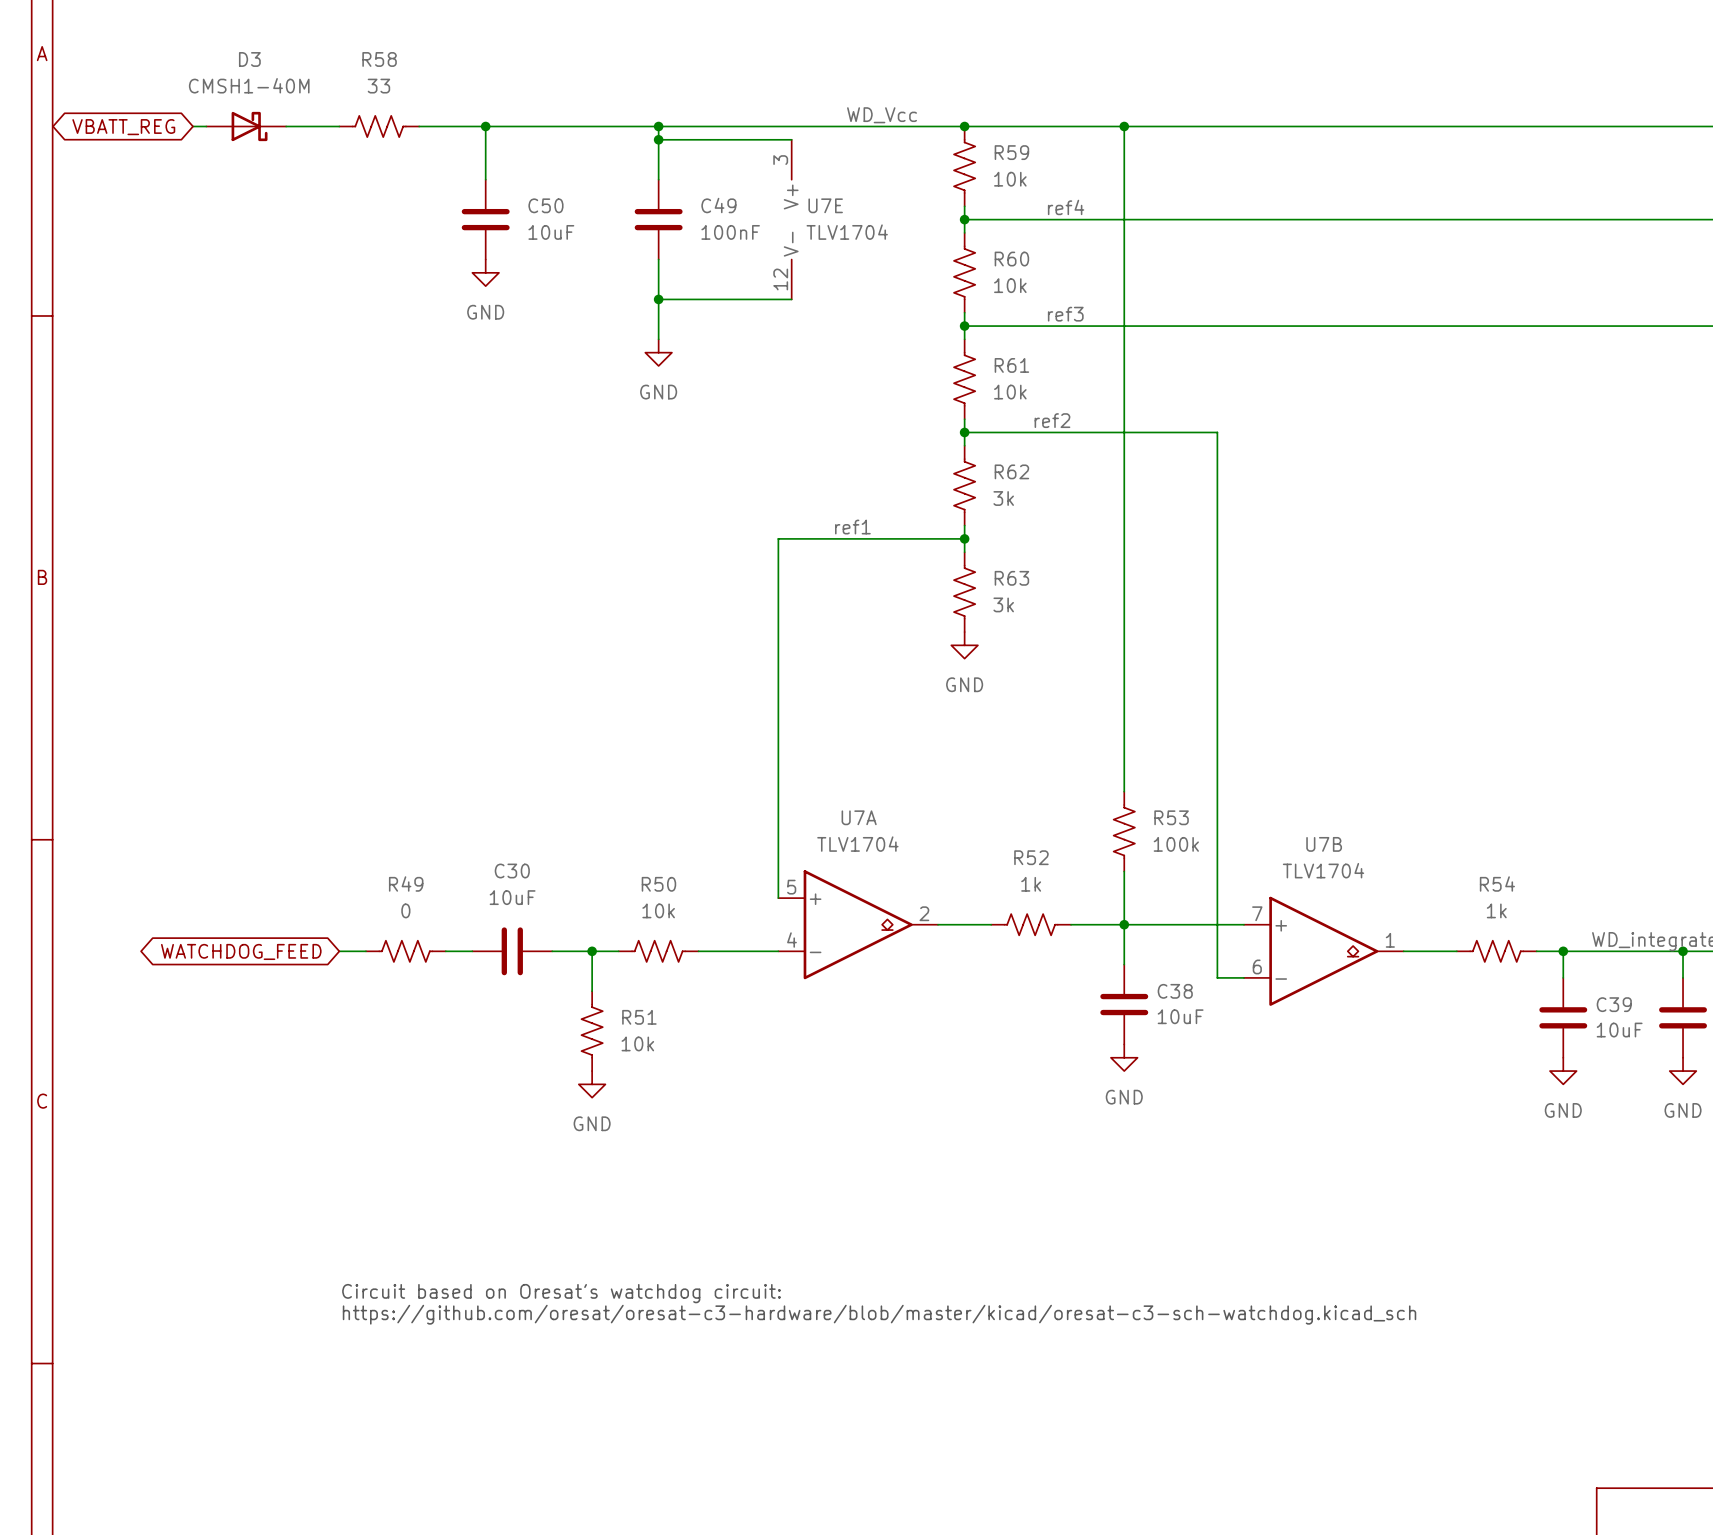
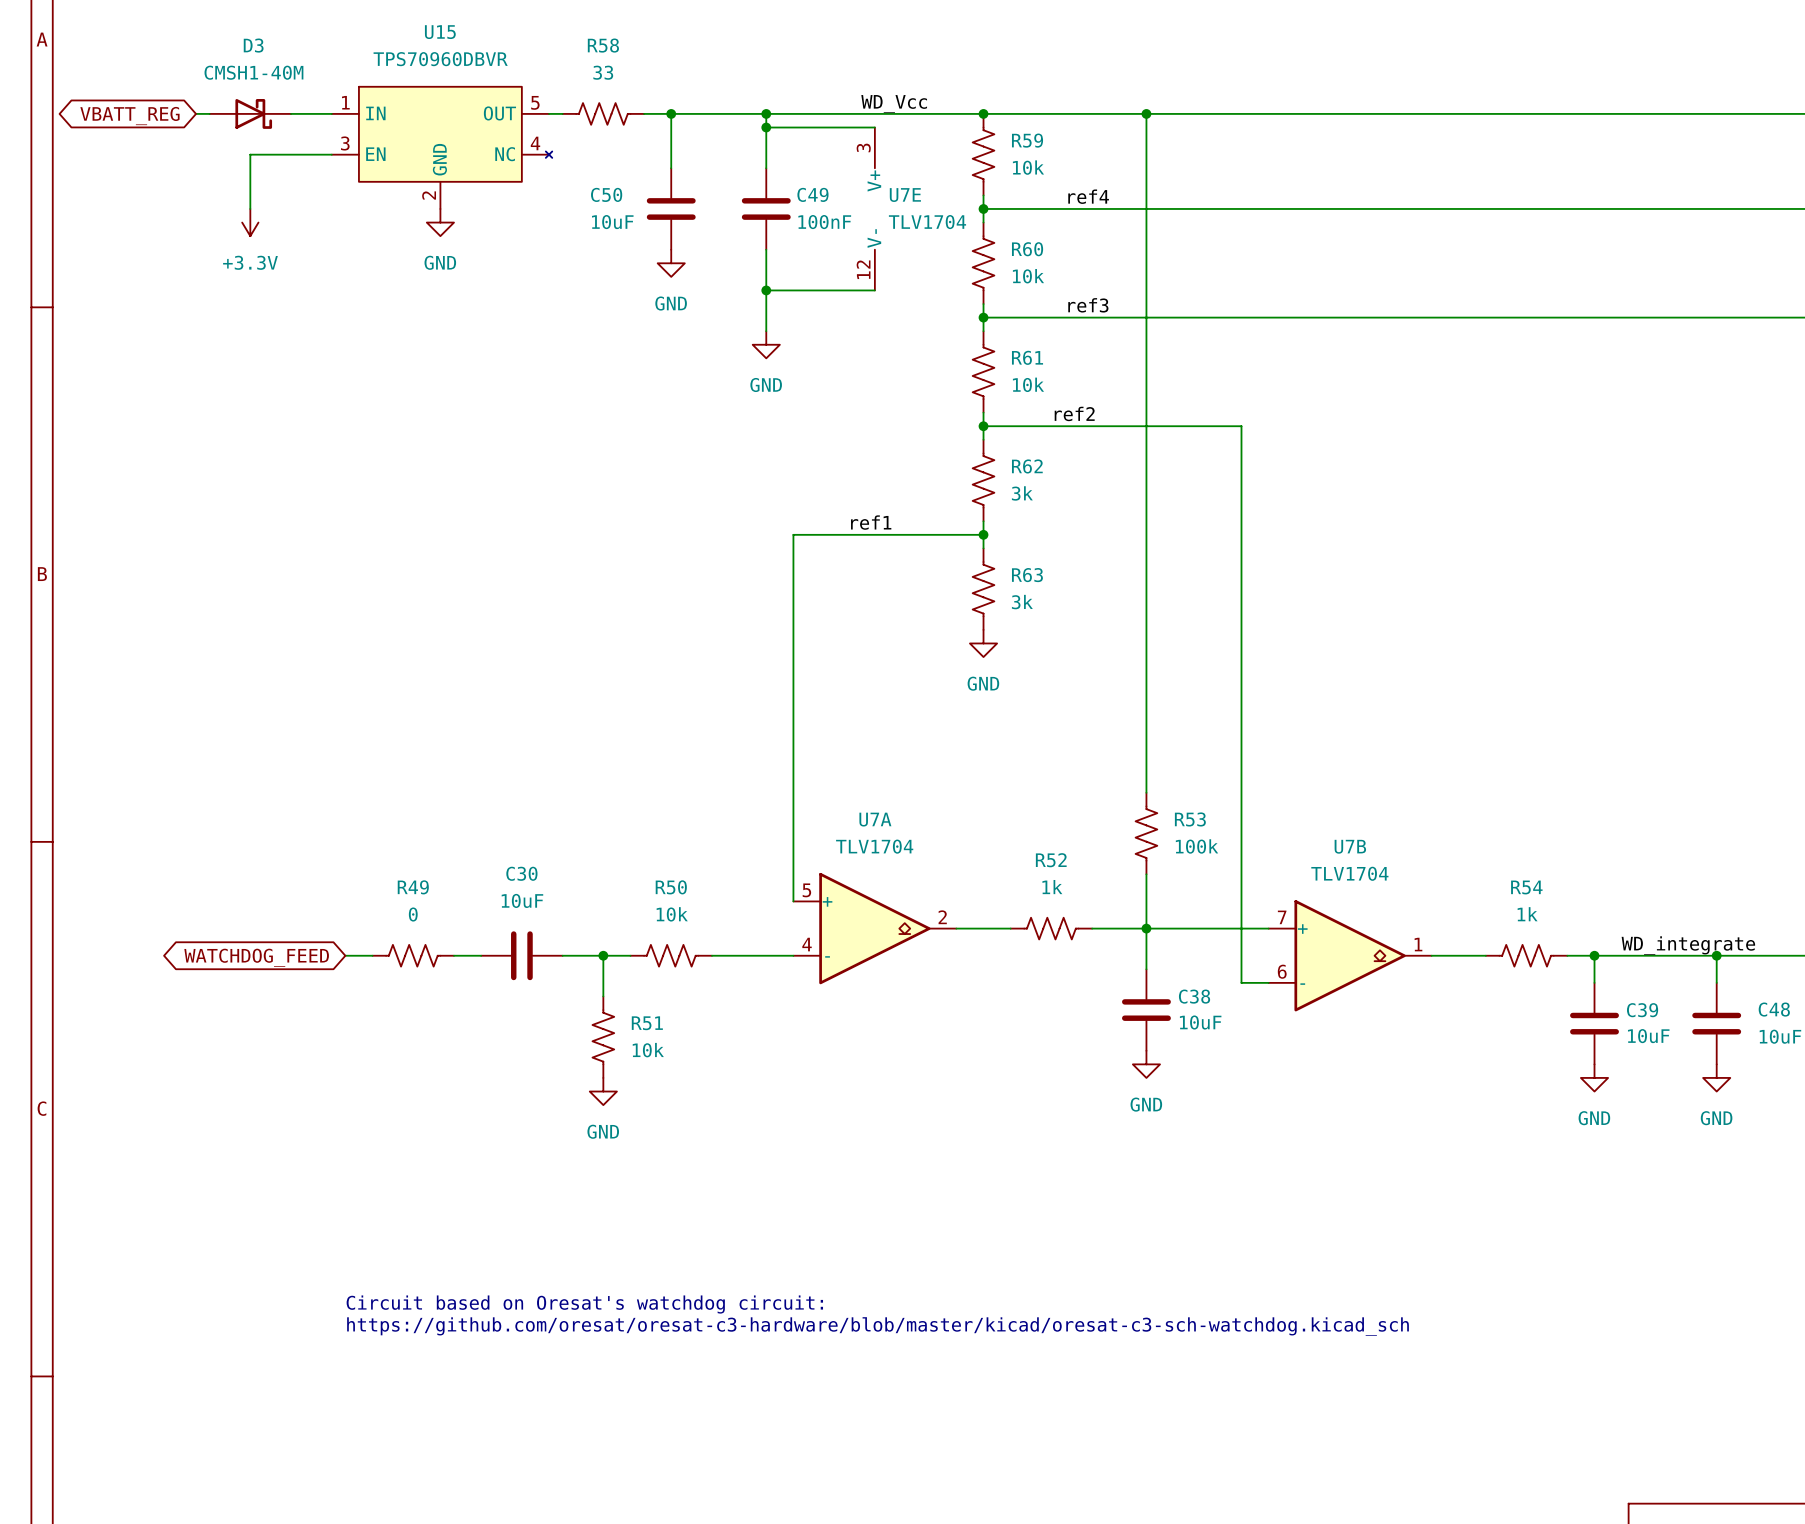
R58 position: (379, 126) -> (603, 113)
junction: (485, 126) -> none
wire: none -> (766, 113) (766, 168)
junction: none -> (766, 113)
wire: (658, 139) (751, 139) -> none
junction: (658, 139) -> none
junction: none -> (766, 127)
wire: none -> (807, 127) (874, 127)
U15: none -> TPS70960DBVR (442, 147)
wire: none -> (331, 154) (250, 154) (250, 208)
C49 name: C49 (718, 205) -> C50 (606, 194)
C50: 10uF (485, 219) -> none
C49: none -> 100nF (766, 208)
U7E position: (791, 219) -> (874, 208)
power symbol: none -> +3.3V (250, 222)
C49 value: 100nF (730, 232) -> 10uF (612, 222)
wire: (658, 259) (658, 339) -> (766, 249) (766, 331)
power symbol position: GND (485, 272) -> GND (440, 222)
power symbol: none -> GND (671, 263)
wire: (658, 299) (751, 299) -> none
junction: (658, 299) -> none
junction: none -> (766, 290)
wire: none -> (807, 290) (874, 290)
power symbol: GND (658, 352) -> none
power symbol: none -> GND (766, 344)

